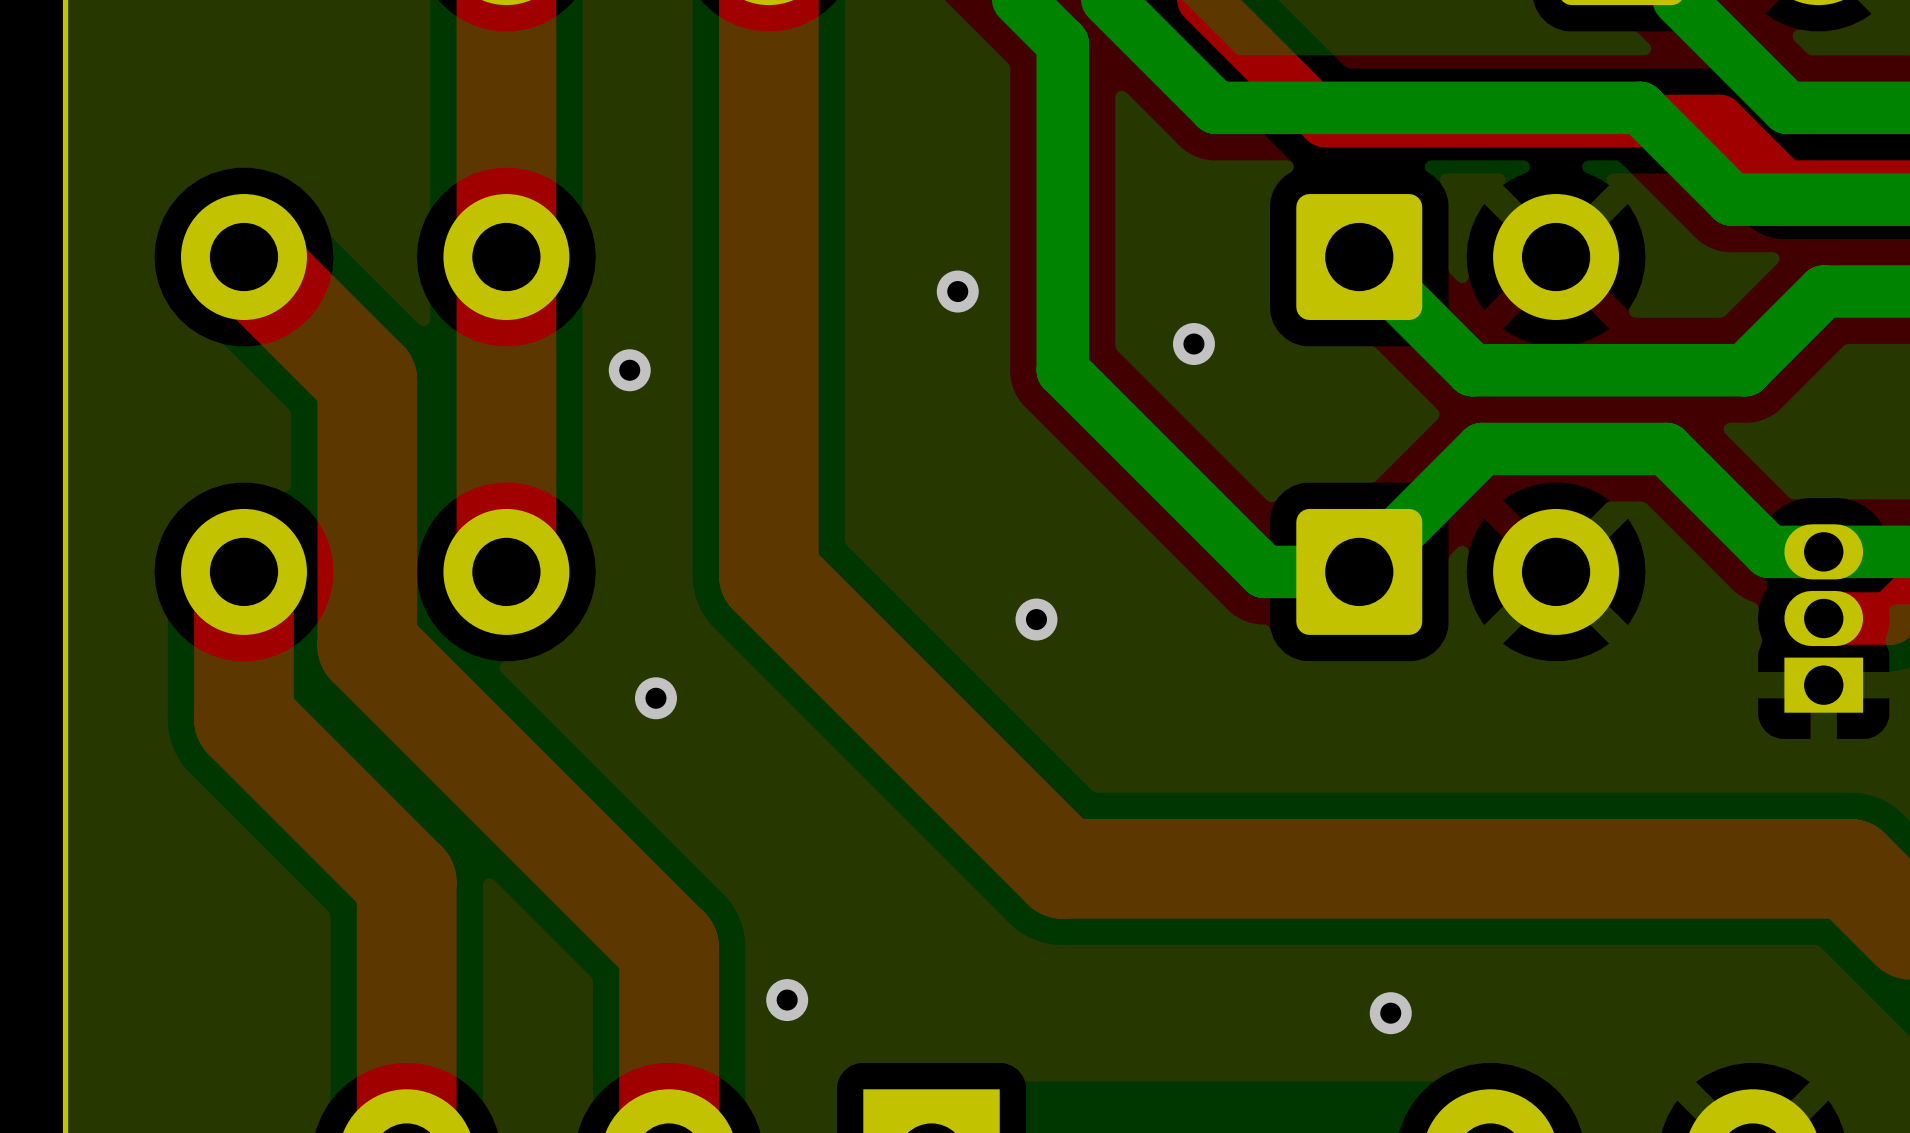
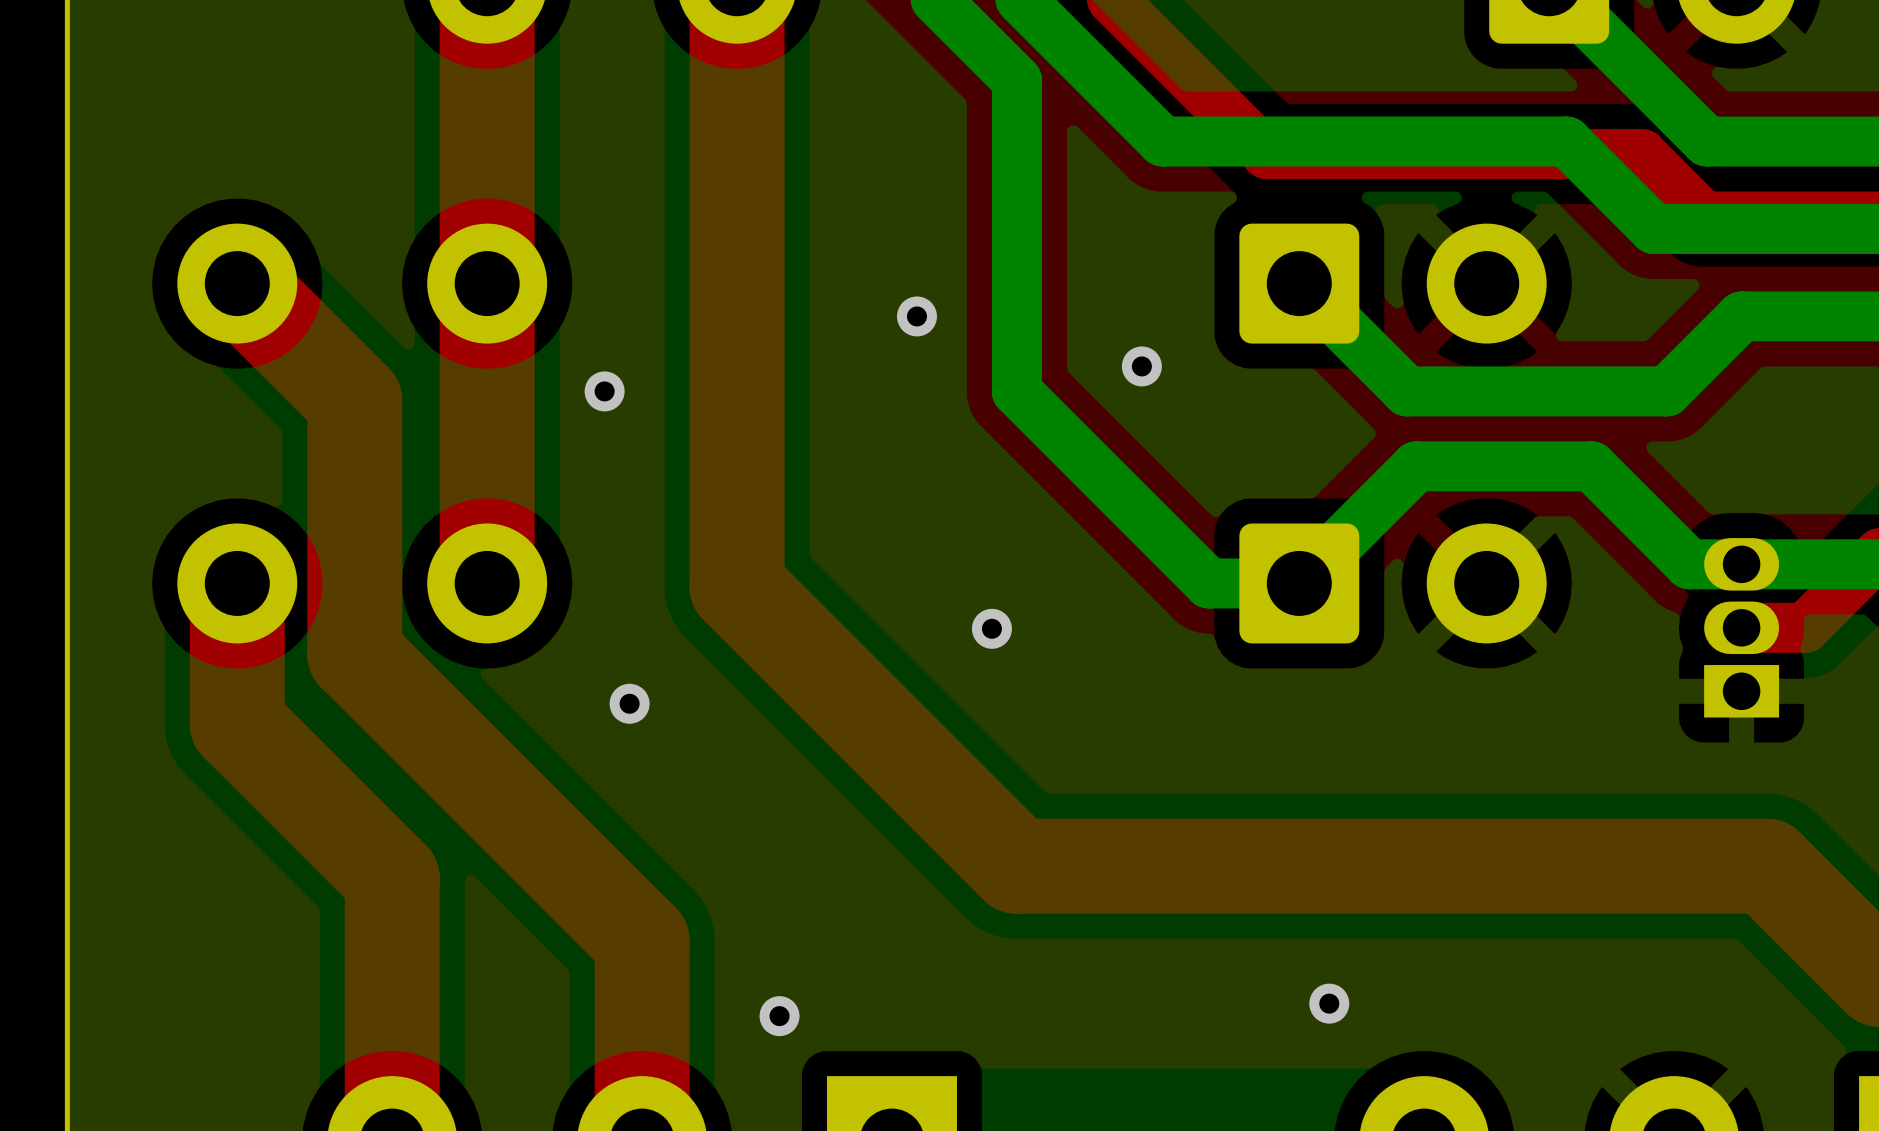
via position: (787, 1000) -> (779, 1016)

